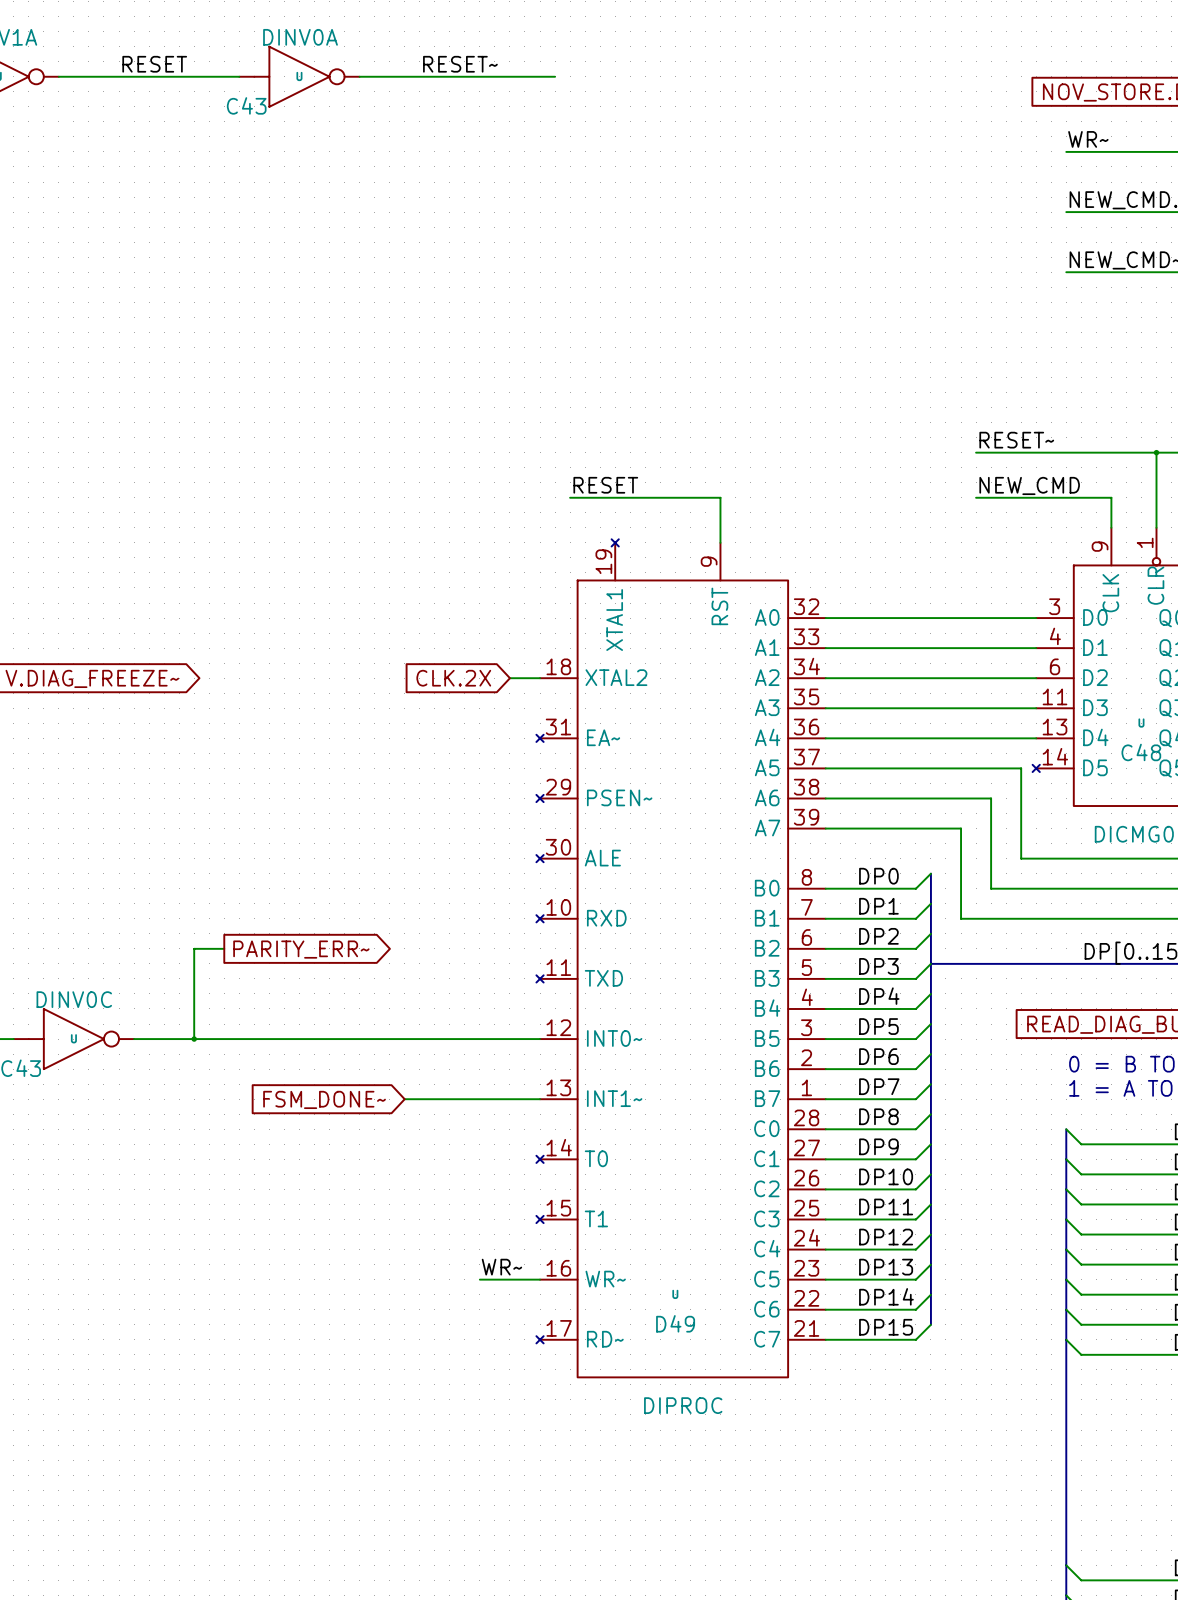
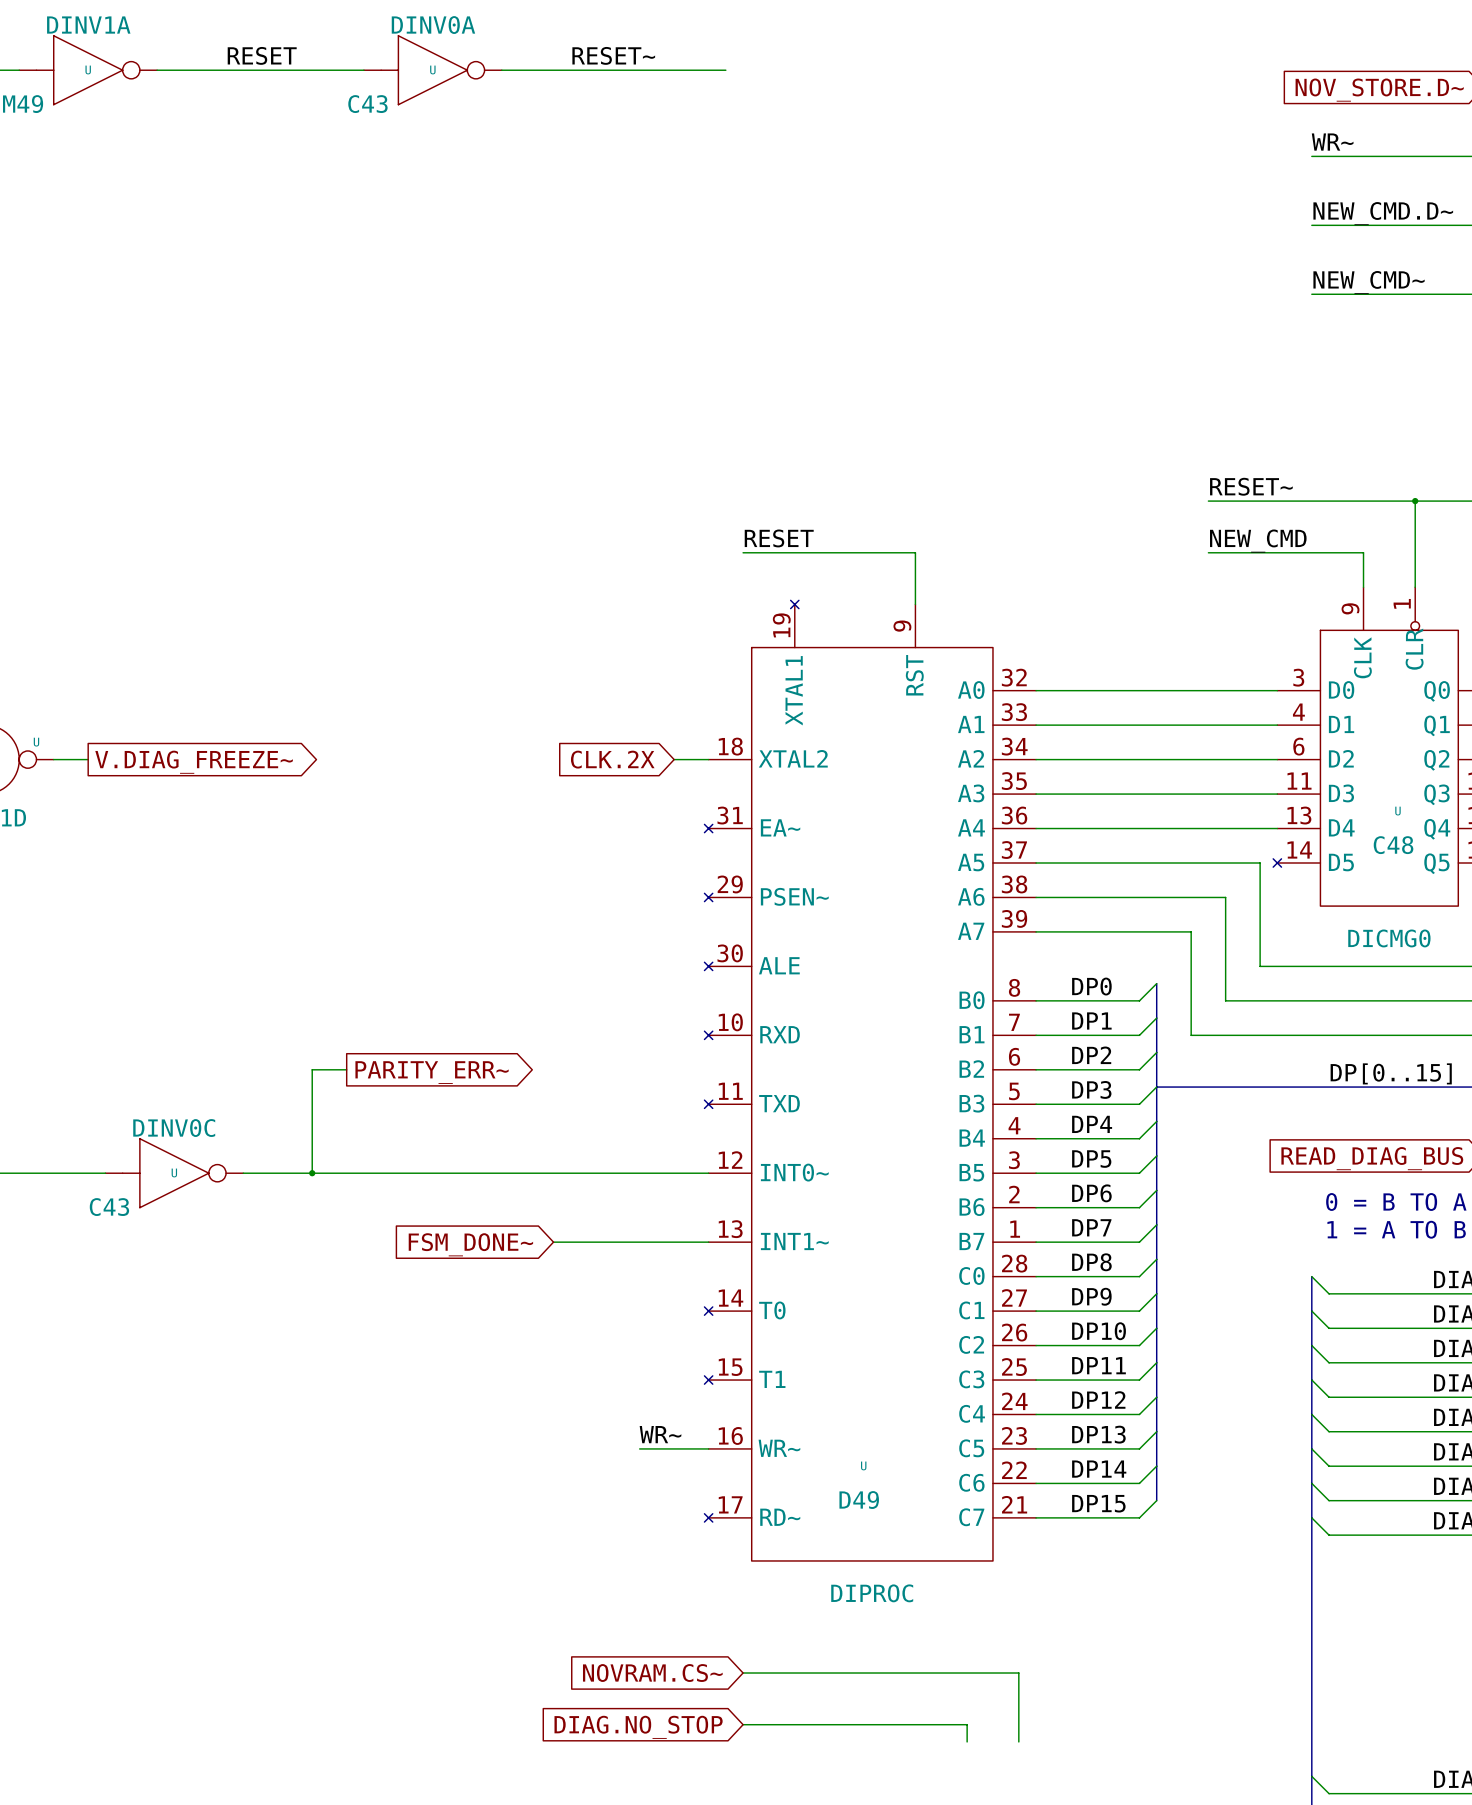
global label: none -> NOVRAM.CS~ (652, 1673)
wire: none -> (743, 1673) (1018, 1673) (1018, 1741)
global label: none -> DIAG.NO_STOP (638, 1727)
wire: none -> (743, 1724) (967, 1724) (967, 1741)

